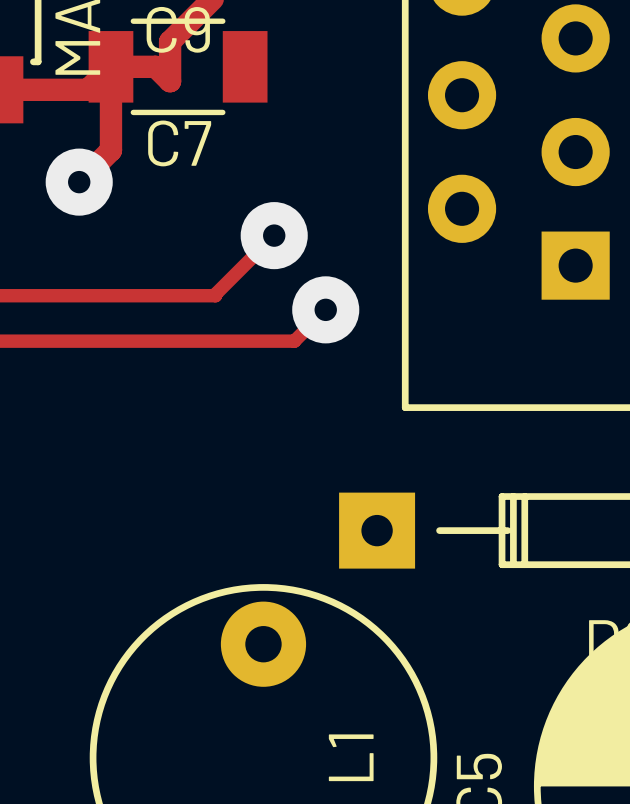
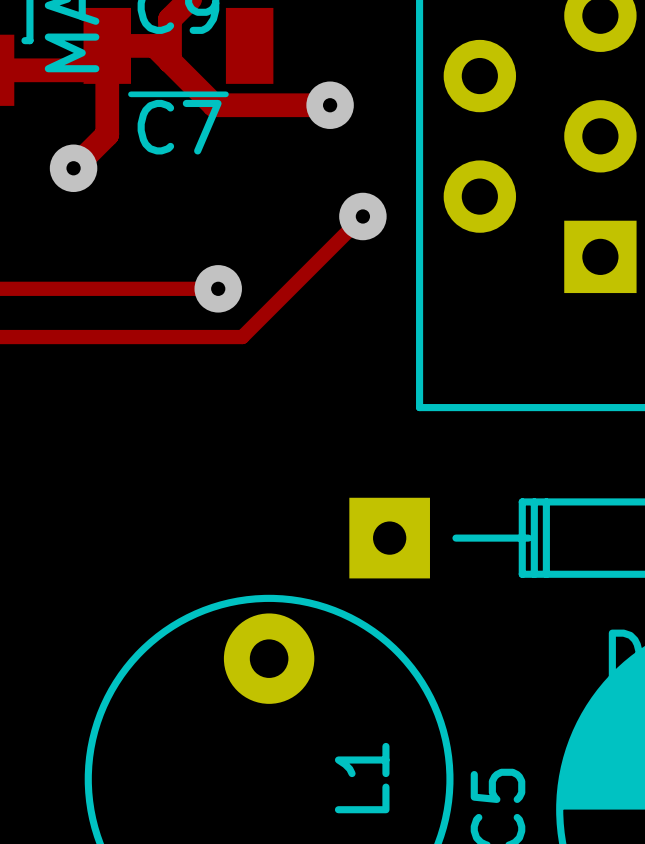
track: none -> (170, 61) (214, 105) (330, 105)
via: none -> (330, 105)
via size: [45, 148, 113, 216] -> [49, 144, 98, 193]
via: none -> (362, 216)
track: (274, 235) (215, 295) -> none
via: (274, 235) -> none
via: none -> (218, 288)
track: (325, 309) (294, 341) (238, 341) -> (362, 216) (242, 337)
via: (325, 309) -> none

